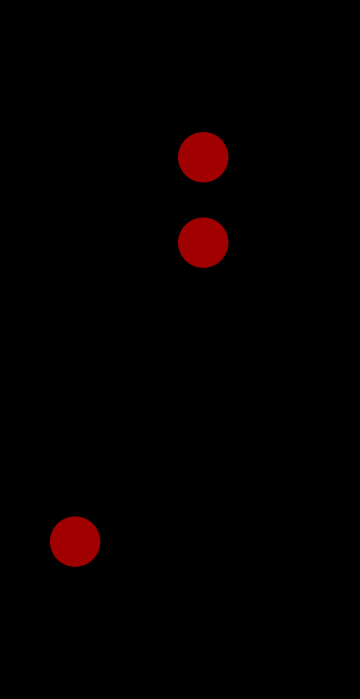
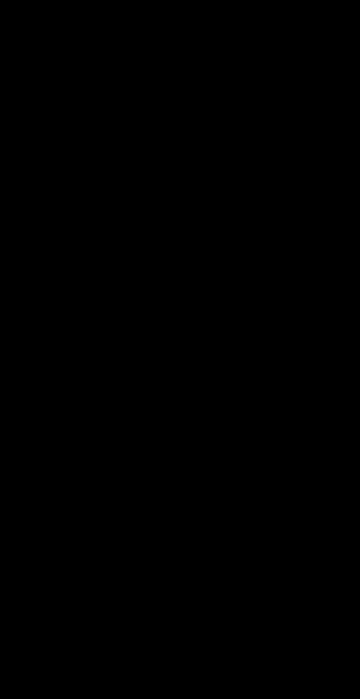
part: (203, 157) -> none
part: (203, 242) -> none
part: (75, 541) -> none

